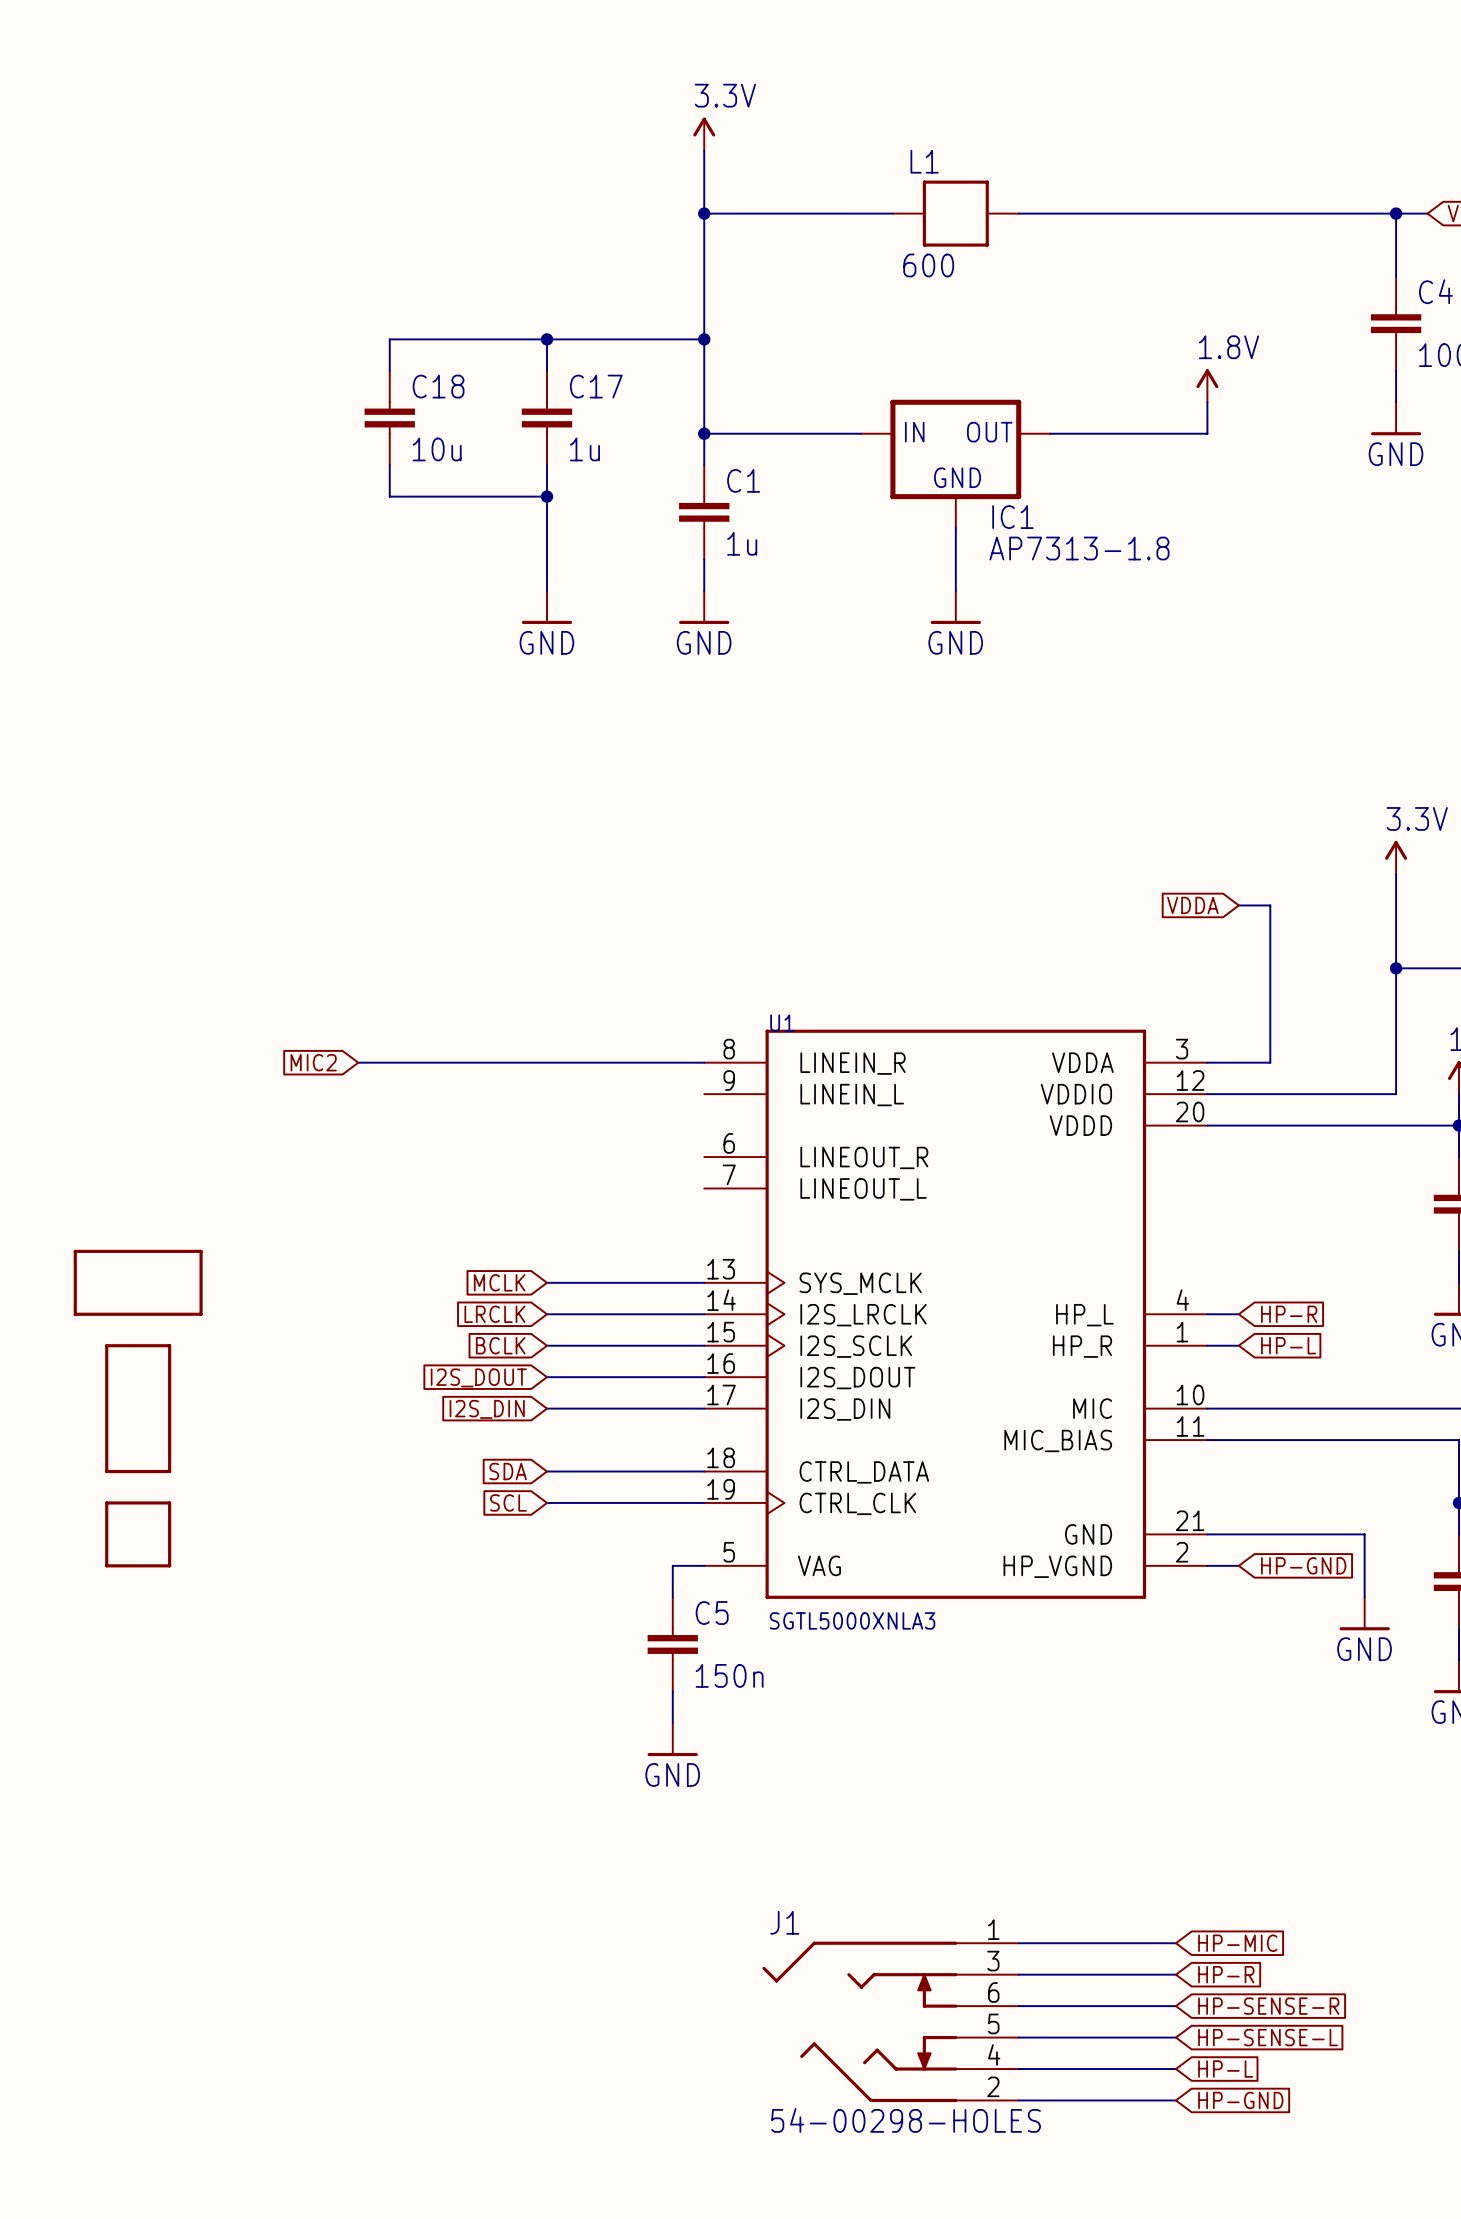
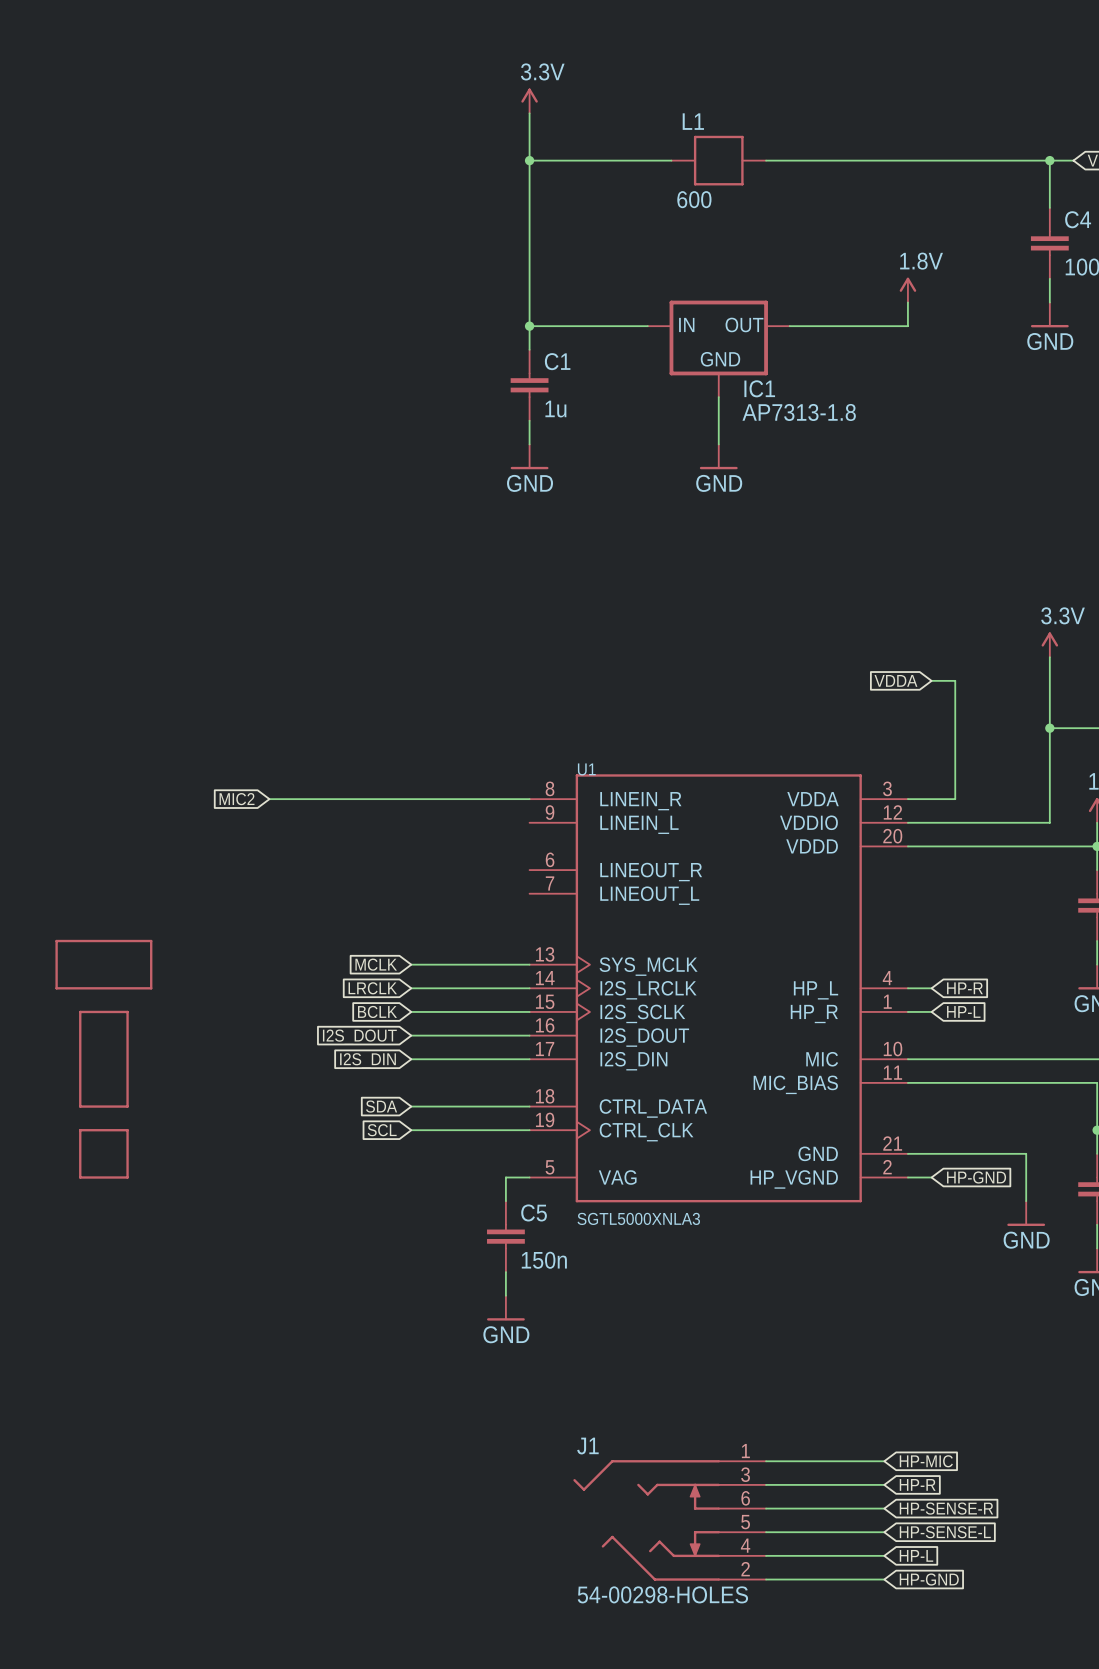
wire: (547, 339) (547, 370) -> none
junction: (547, 339) -> none
wire: (704, 339) (389, 339) (389, 370) -> none
junction: (704, 339) -> none
C18: 10u (389, 418) -> none
C17: 1u (547, 418) -> none
wire: (389, 465) (389, 496) (547, 496) -> none
wire: (547, 465) (547, 590) -> none
junction: (547, 496) -> none
power symbol: GND (547, 607) -> none

